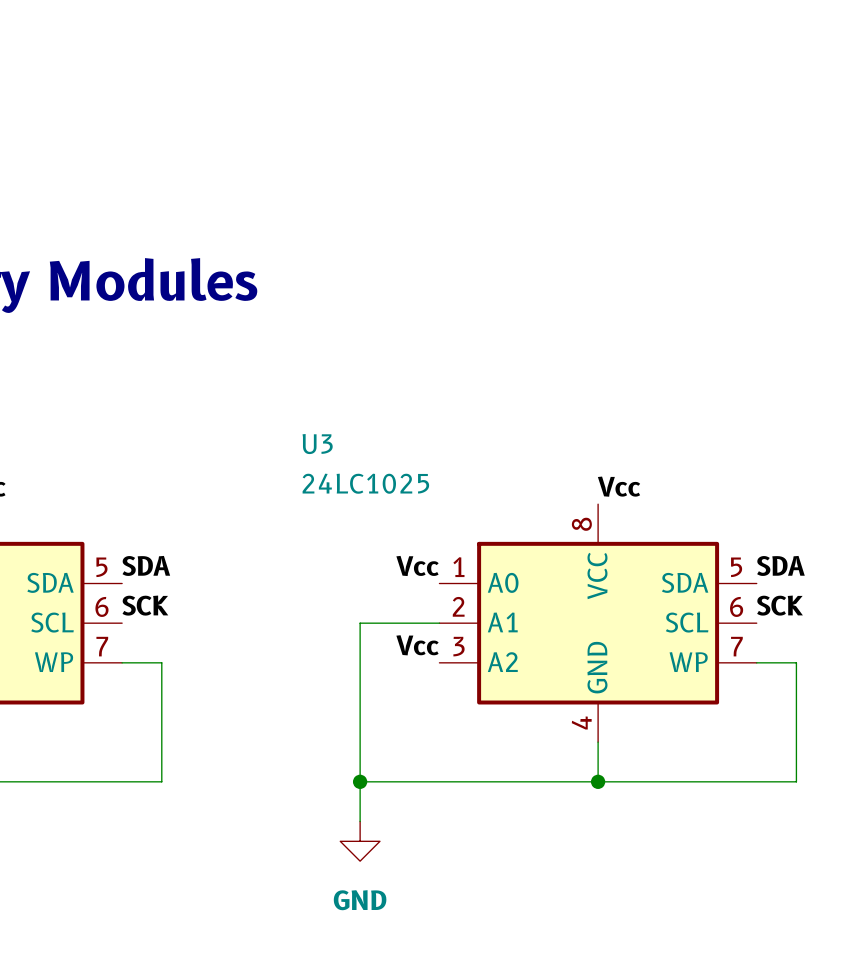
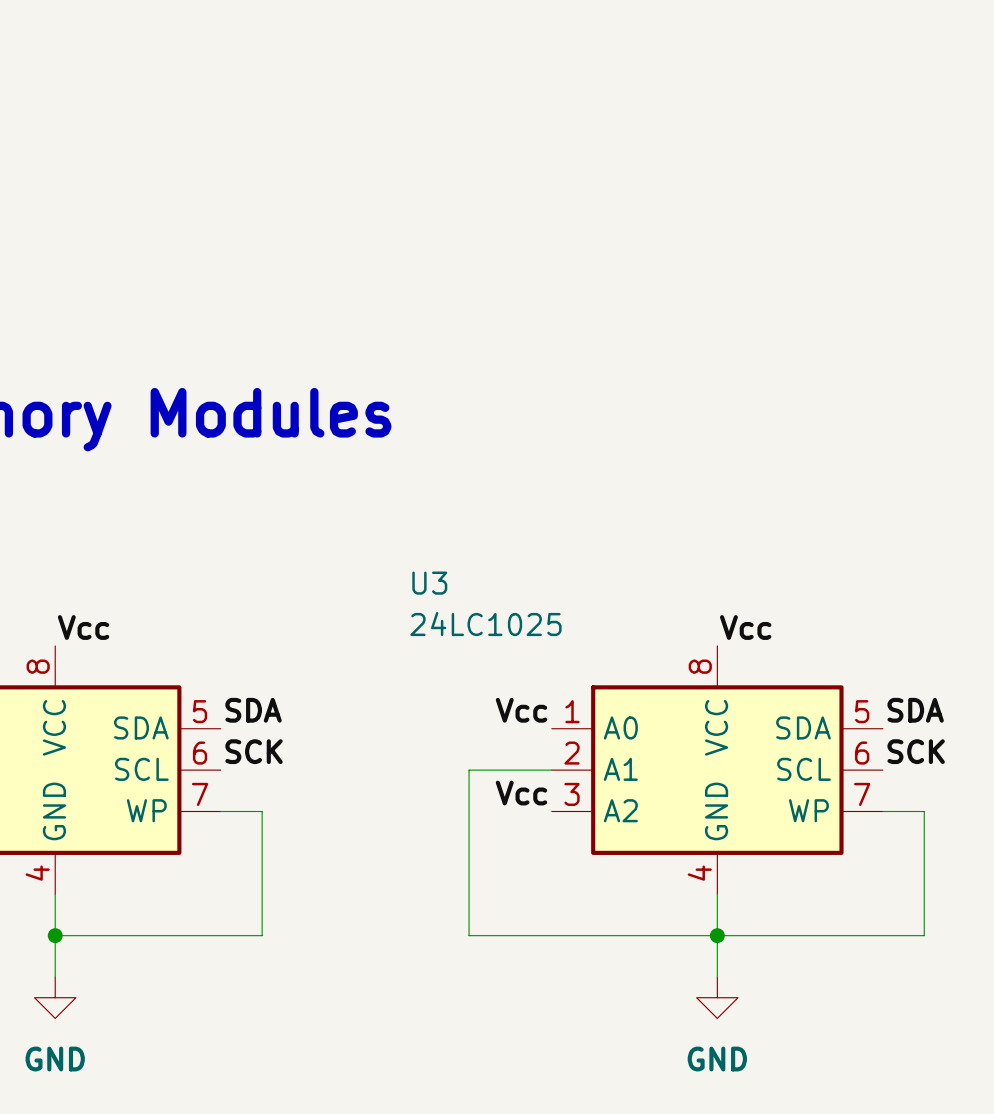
wire: (360, 781) (360, 821) -> (717, 935) (717, 977)
junction: (360, 781) -> none
power symbol position: GND (360, 841) -> GND (717, 997)

